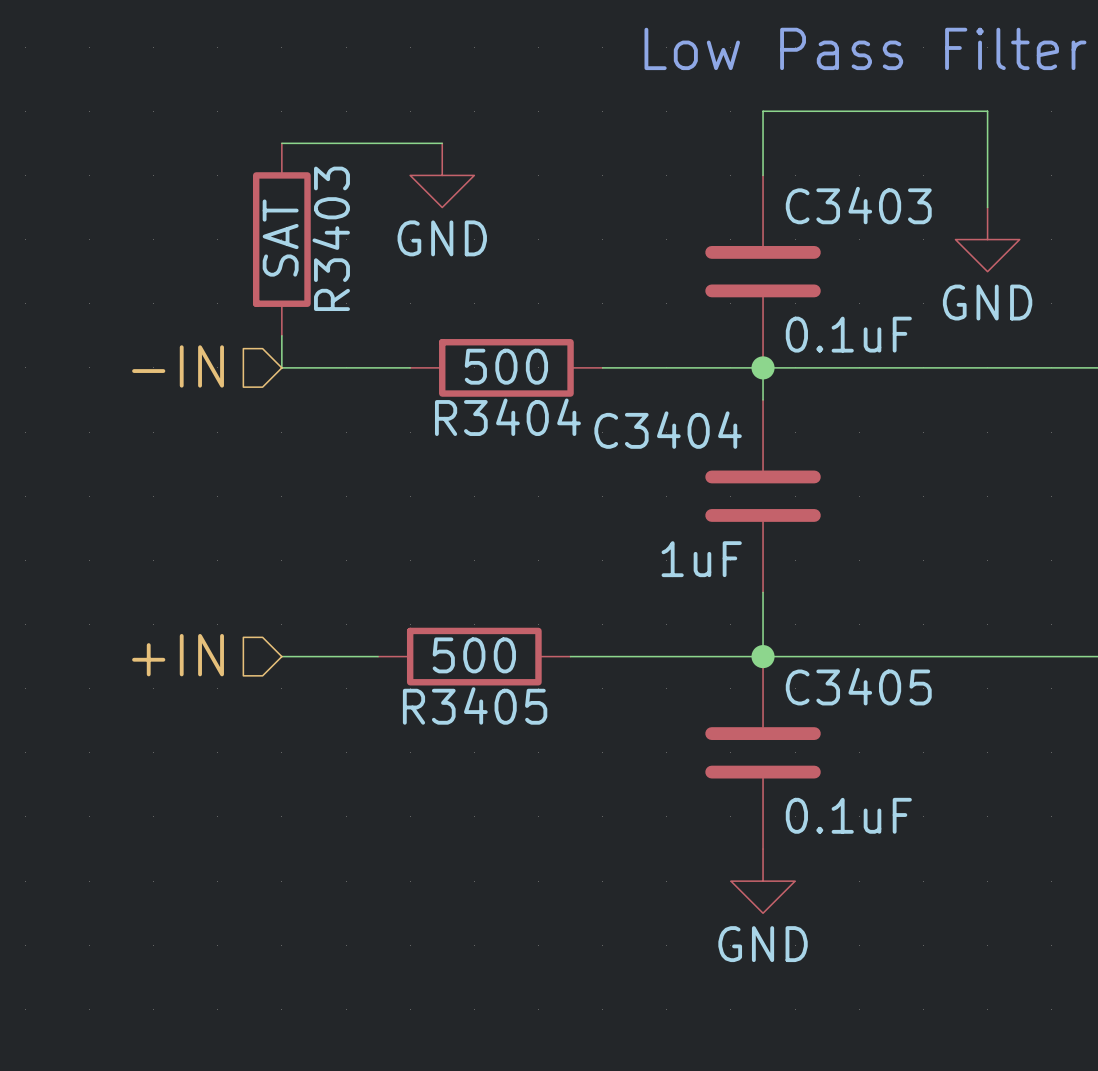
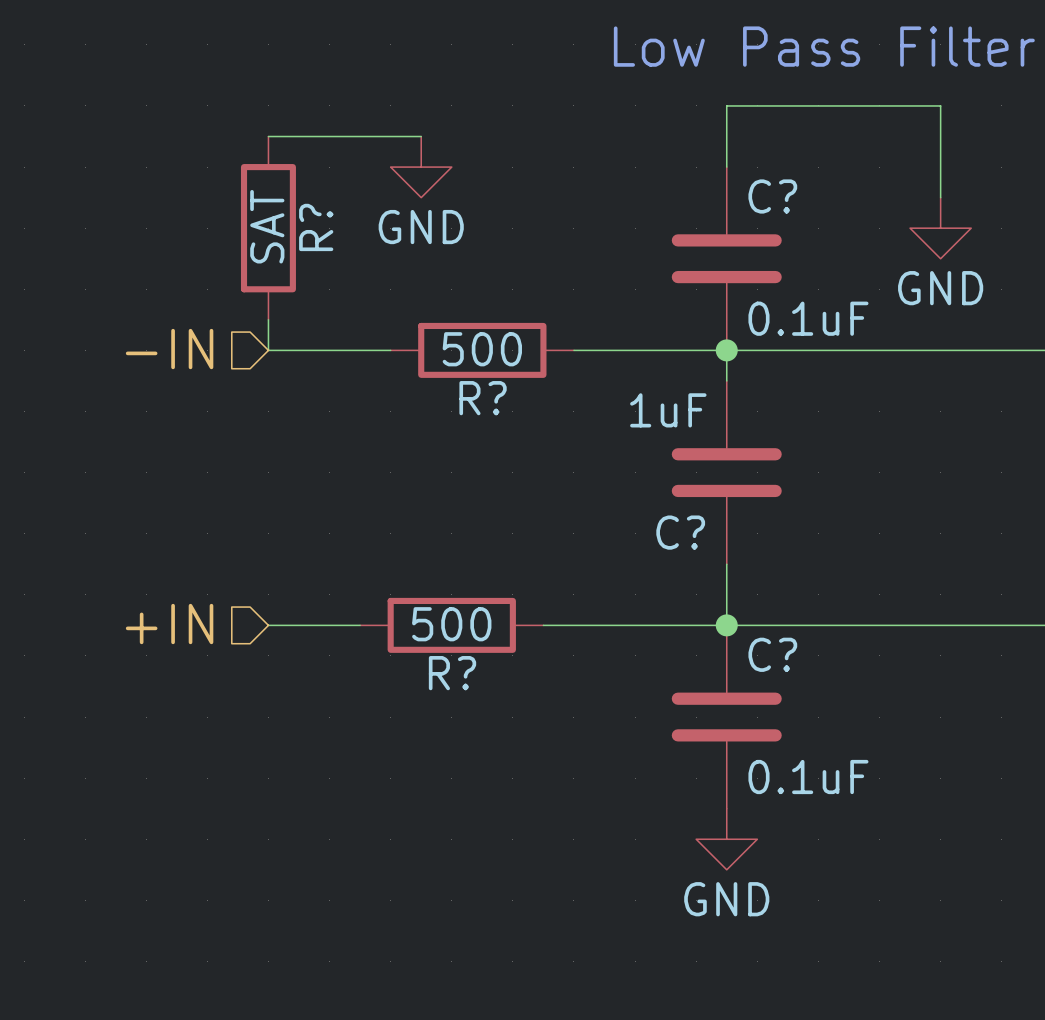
C3403 name: C3403 (858, 205) -> C? (772, 196)
R3403 name: R3403 (331, 238) -> R? (316, 227)
R3404 name: R3404 (507, 417) -> R? (483, 398)
C3404 name: C3404 (668, 430) -> C? (680, 532)
C3404 value position: 1uF (701, 559) -> 1uF (668, 410)
C3405 name: C3405 (858, 686) -> C? (772, 654)
R3405 name: R3405 (475, 705) -> R? (452, 673)

